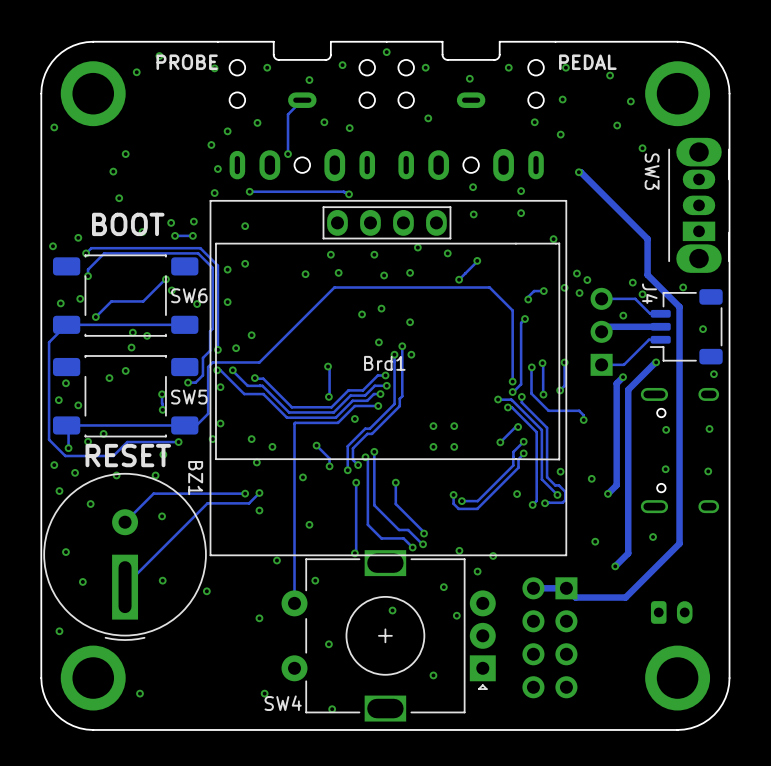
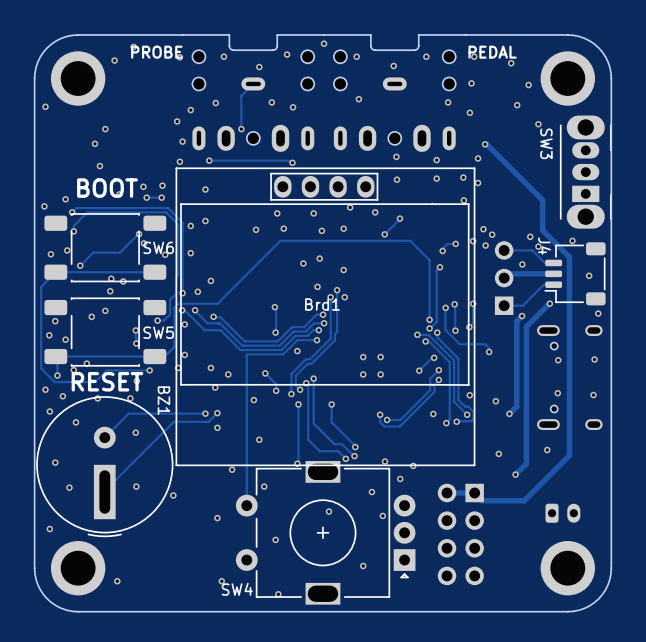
via: none -> (478, 158)
via: none -> (463, 177)
via: none -> (478, 182)

